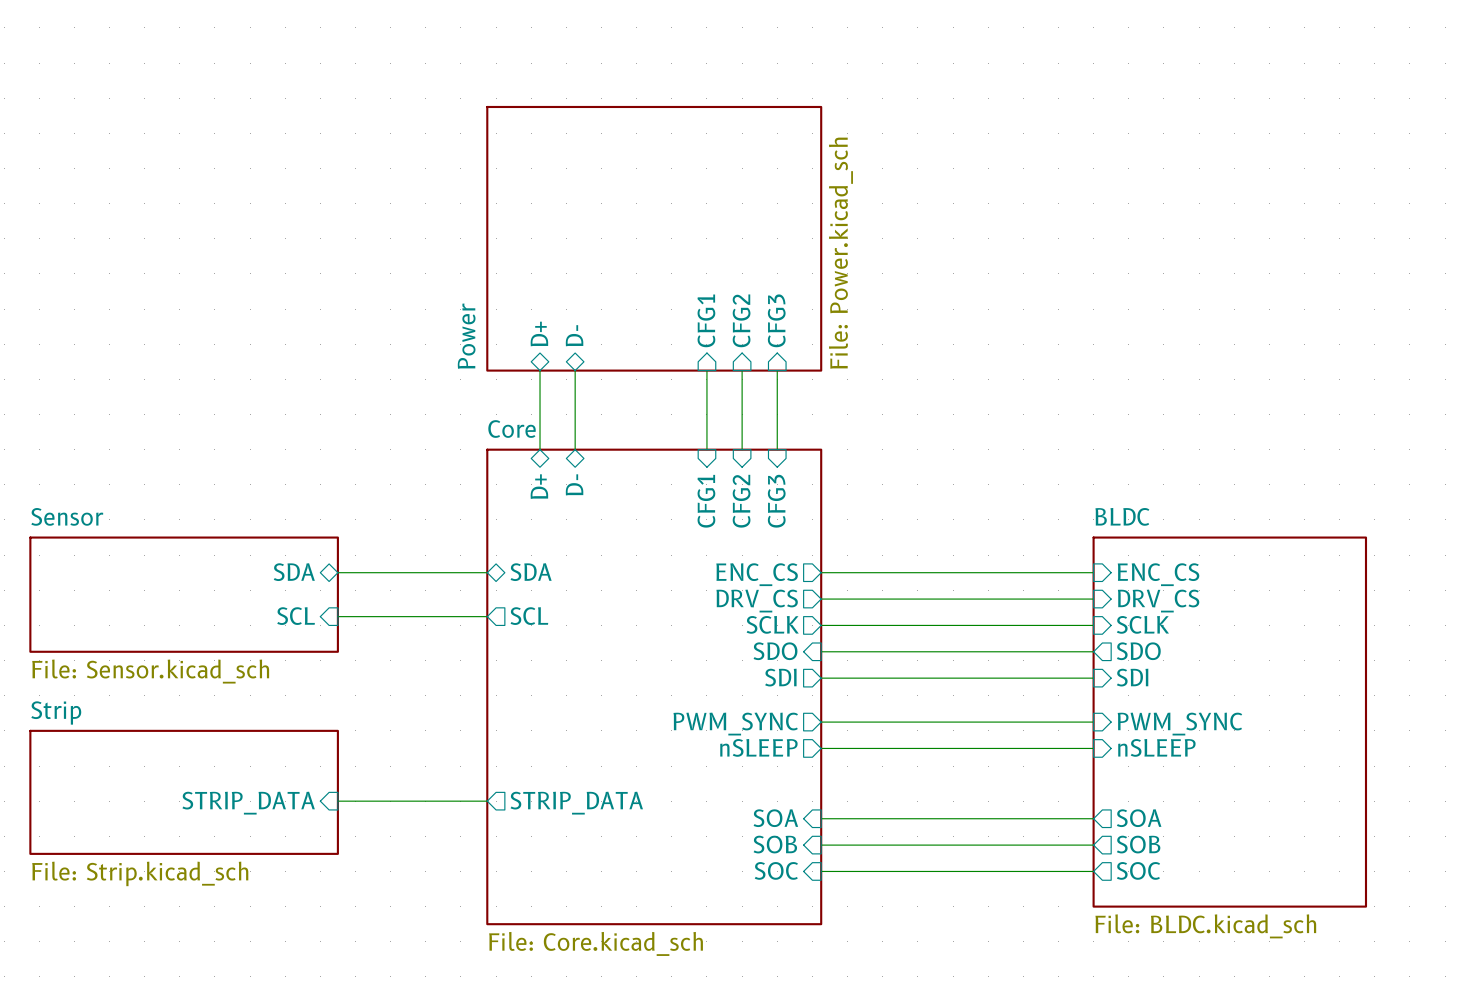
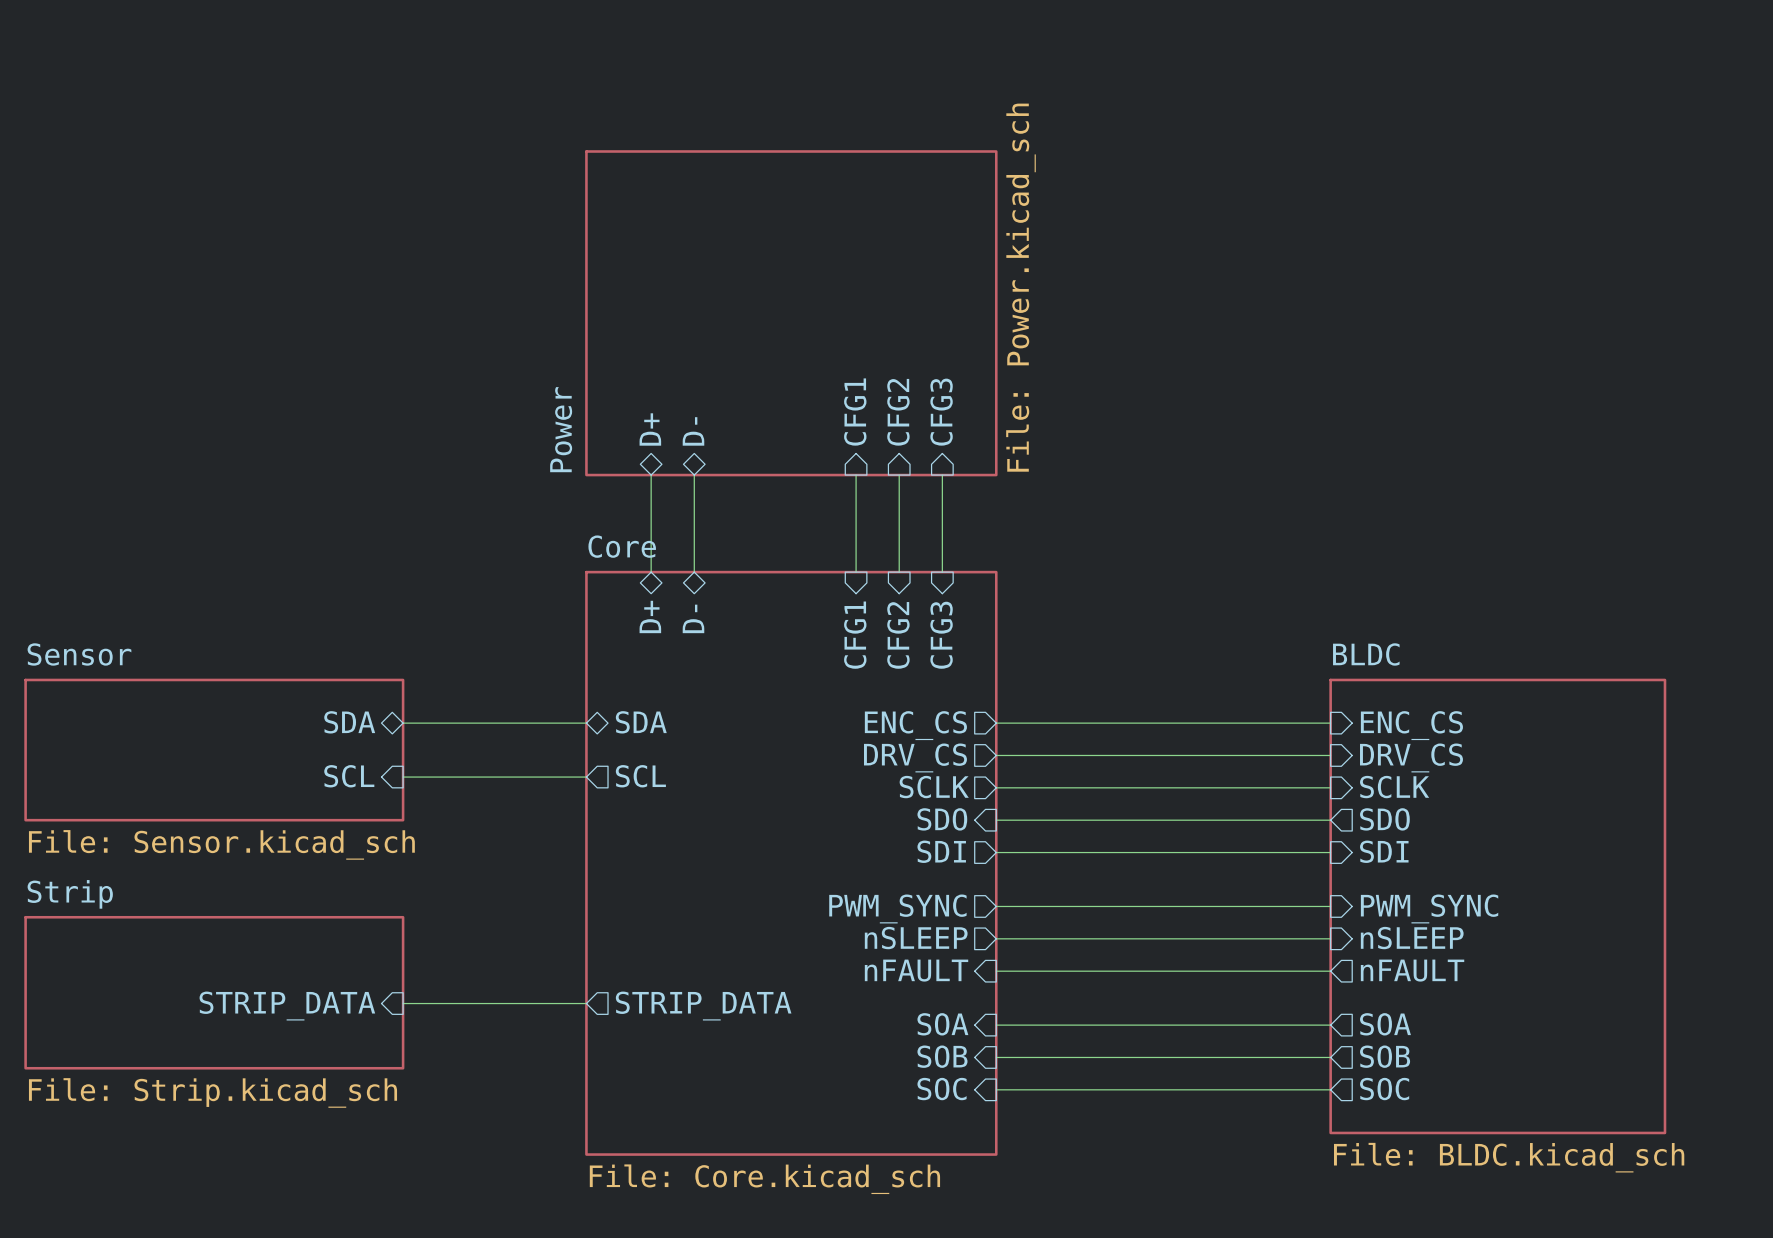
sheet pin: none -> nFAULT (916, 970)
wire: none -> (996, 971) (1330, 971)
sheet pin: none -> nFAULT (1412, 970)

